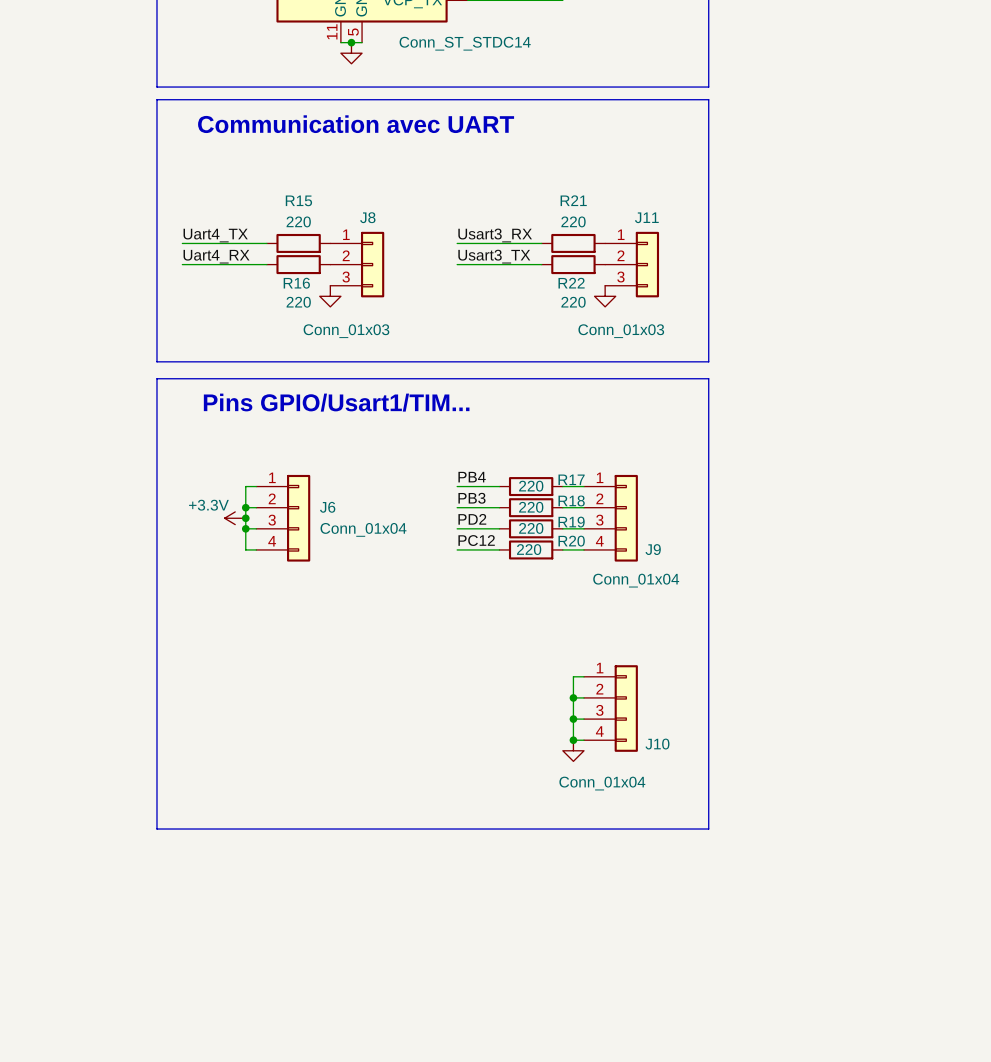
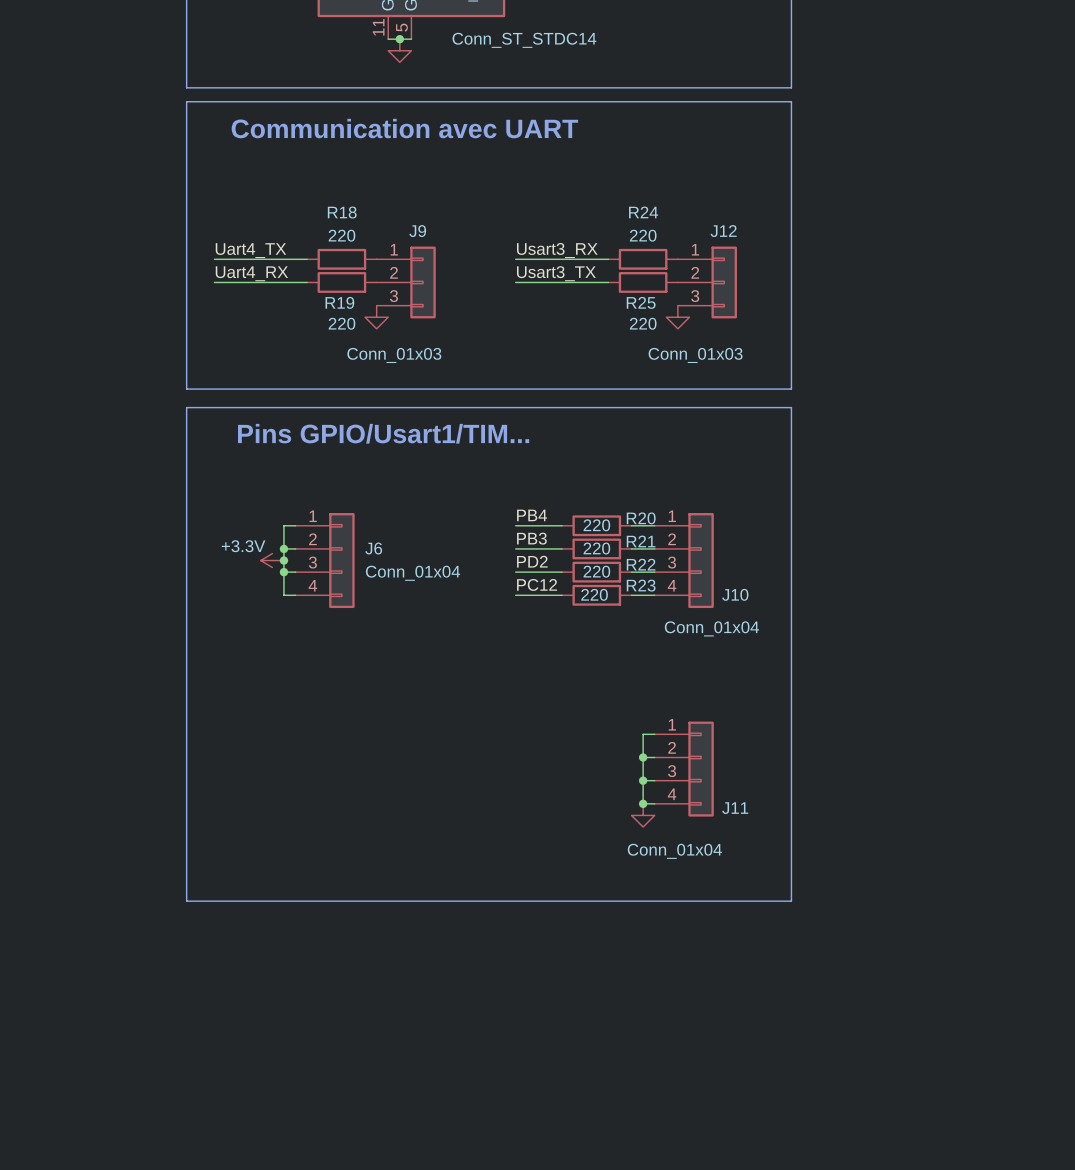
R15 name: R15 (298, 200) -> R18 (342, 212)
R21 name: R21 (573, 200) -> R24 (643, 212)
J8 name: J8 (367, 217) -> J9 (417, 231)
J11 name: J11 (646, 217) -> J12 (723, 231)
R16 name: R16 (296, 283) -> R19 (339, 302)
R22 name: R22 (571, 283) -> R25 (641, 302)
R17 name: R17 (571, 479) -> R20 (641, 518)
R18 name: R18 (571, 500) -> R21 (641, 541)
R19 name: R19 (571, 522) -> R22 (641, 564)
R20 name: R20 (571, 541) -> R23 (641, 585)
J9 name: J9 (653, 549) -> J10 (735, 594)
J10 name: J10 (657, 744) -> J11 (735, 808)

